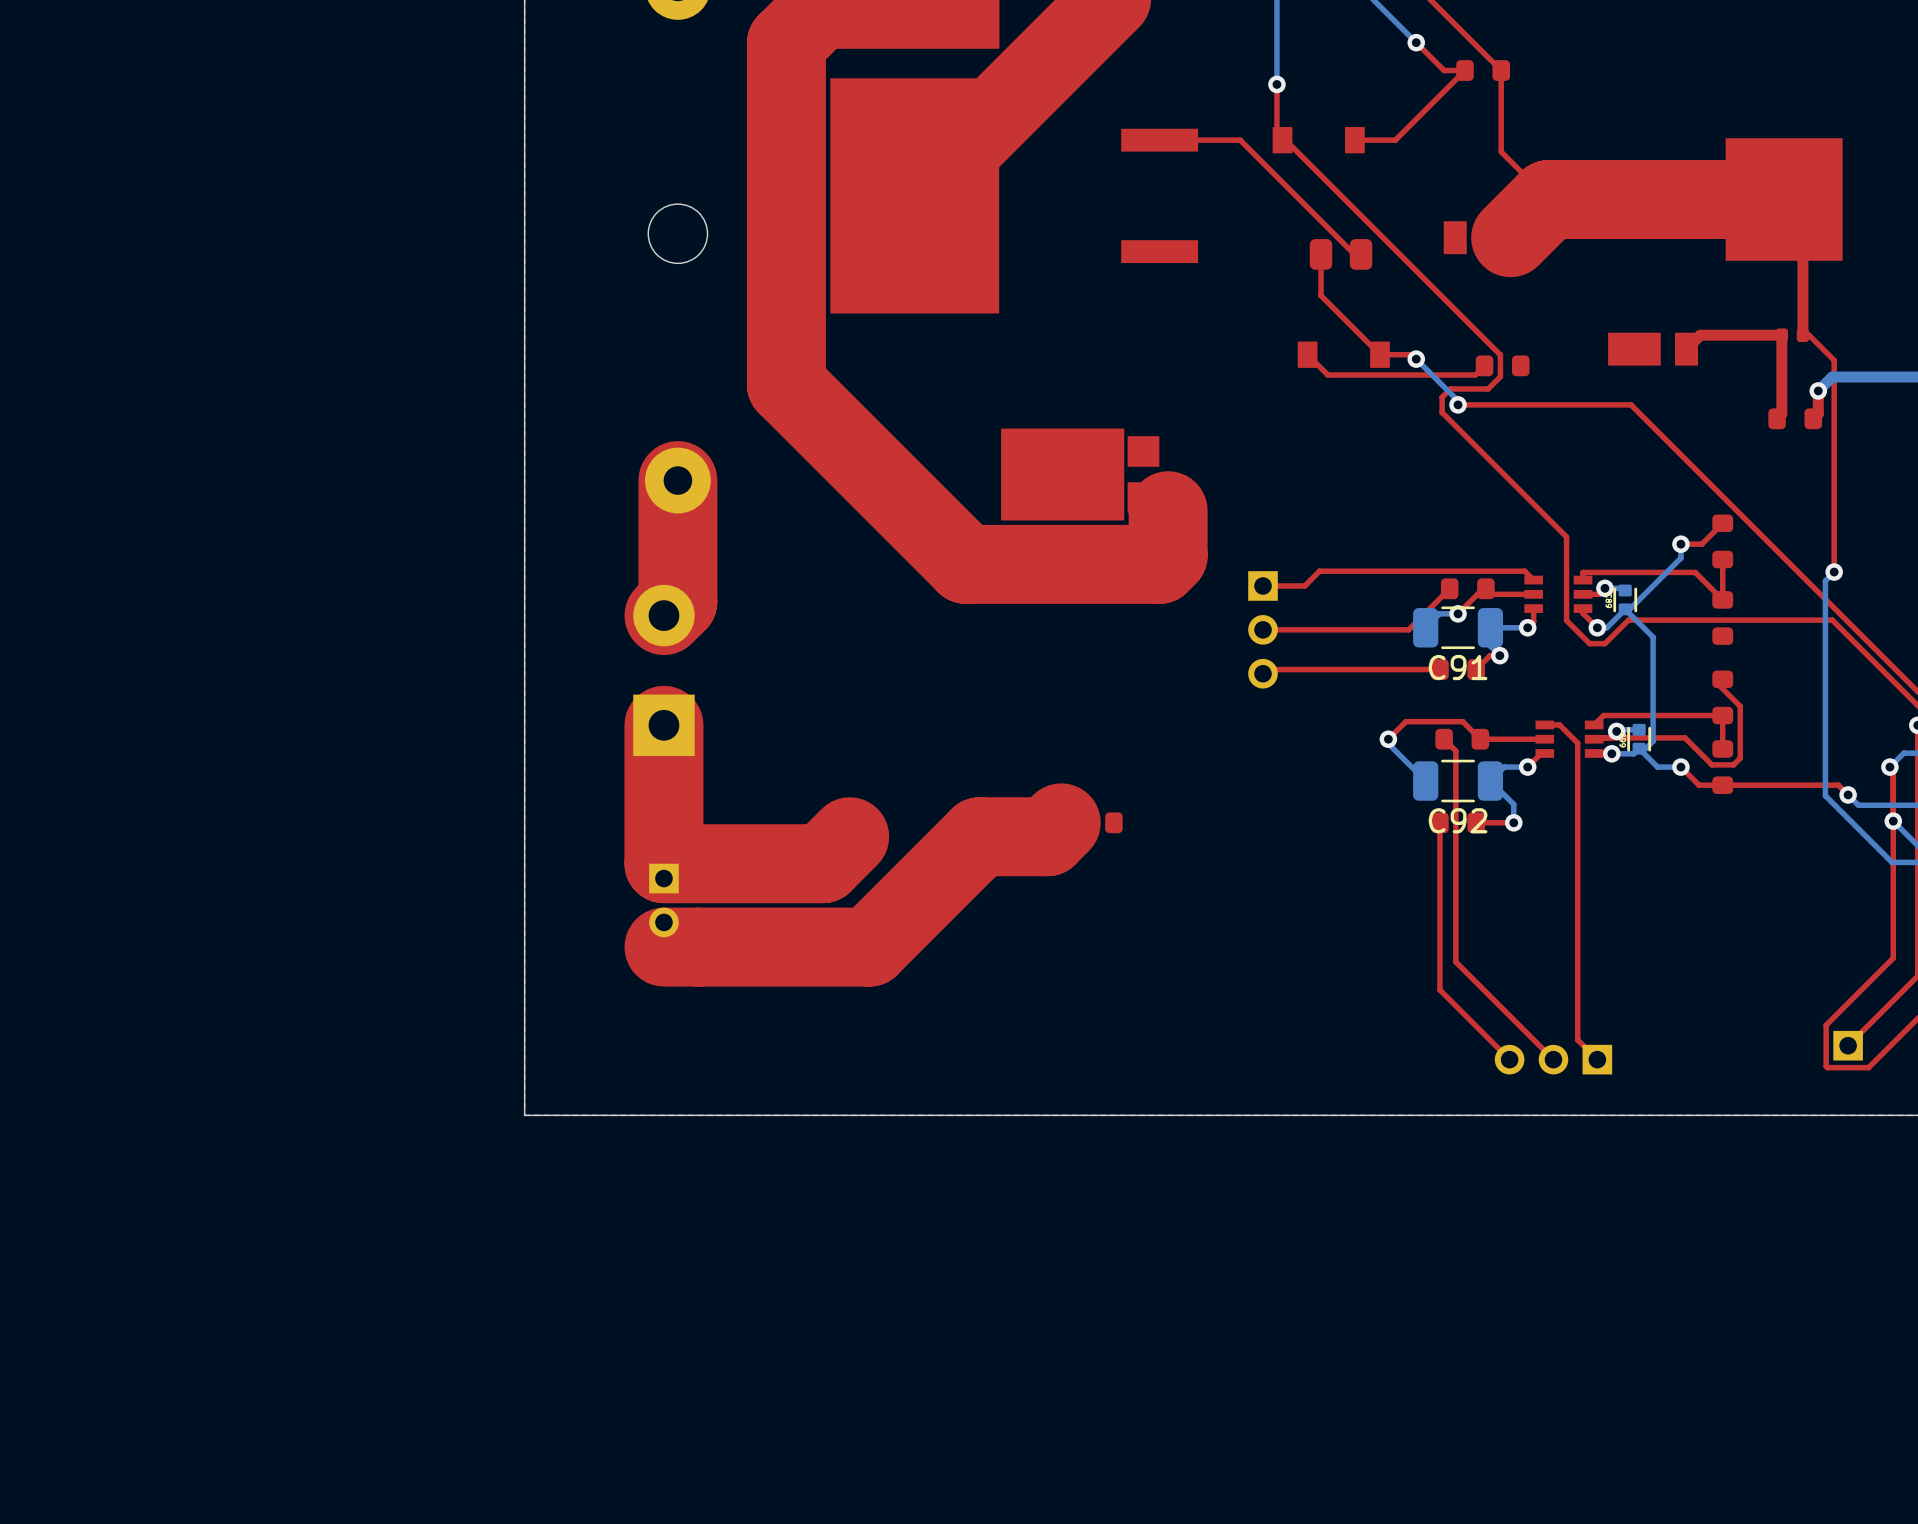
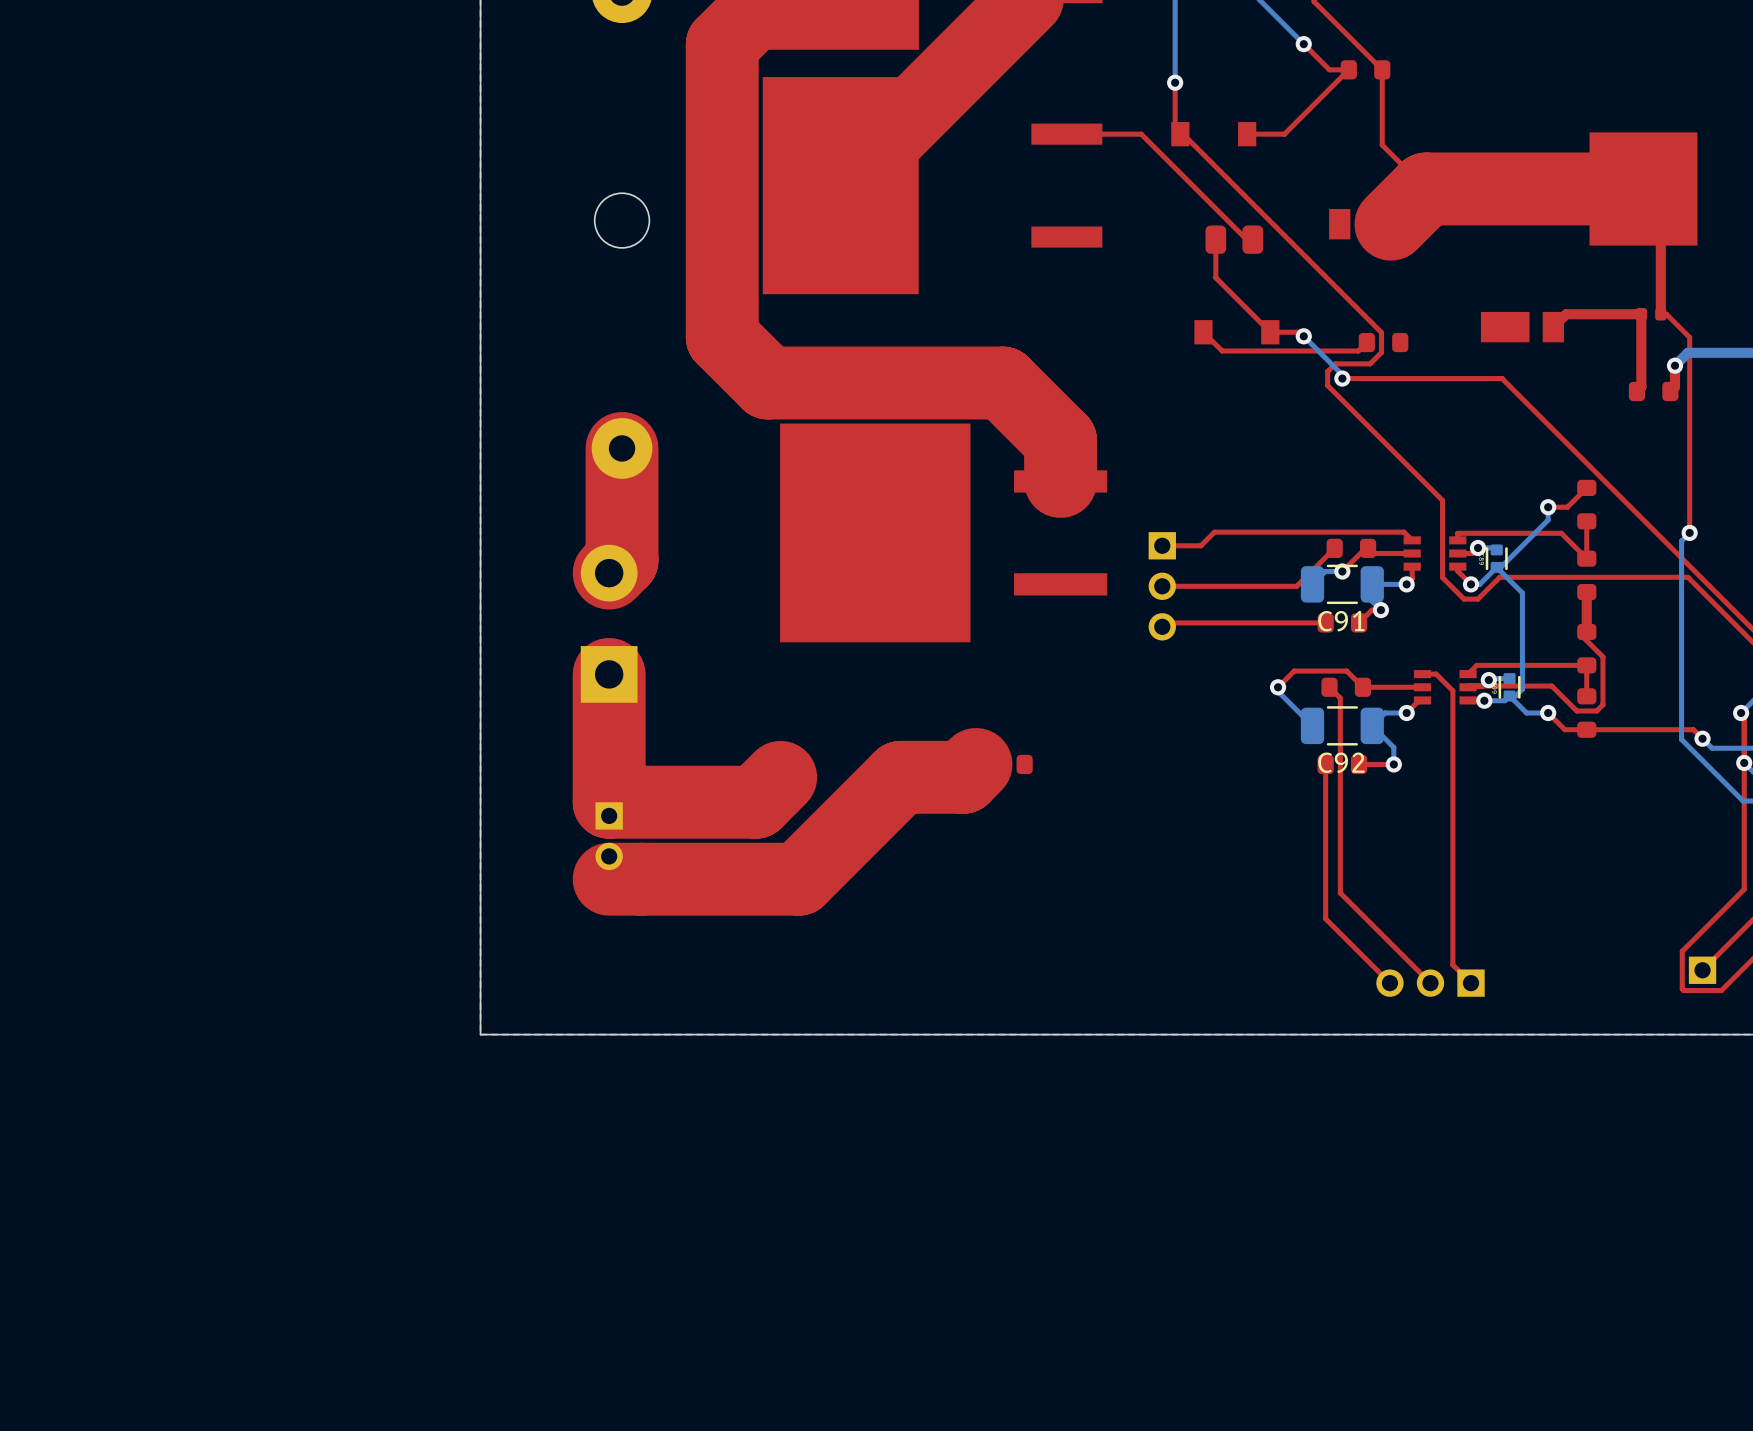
top track: (786, 360) (786, 384) (966, 564) (1159, 564) (1168, 555) (1168, 510) -> (722, 337) (767, 383) (1002, 383) (1060, 440) (1060, 481)
part: (1080, 474) -> none
part: none -> (943, 532)
top track: none -> (1586, 592) (1586, 631)

